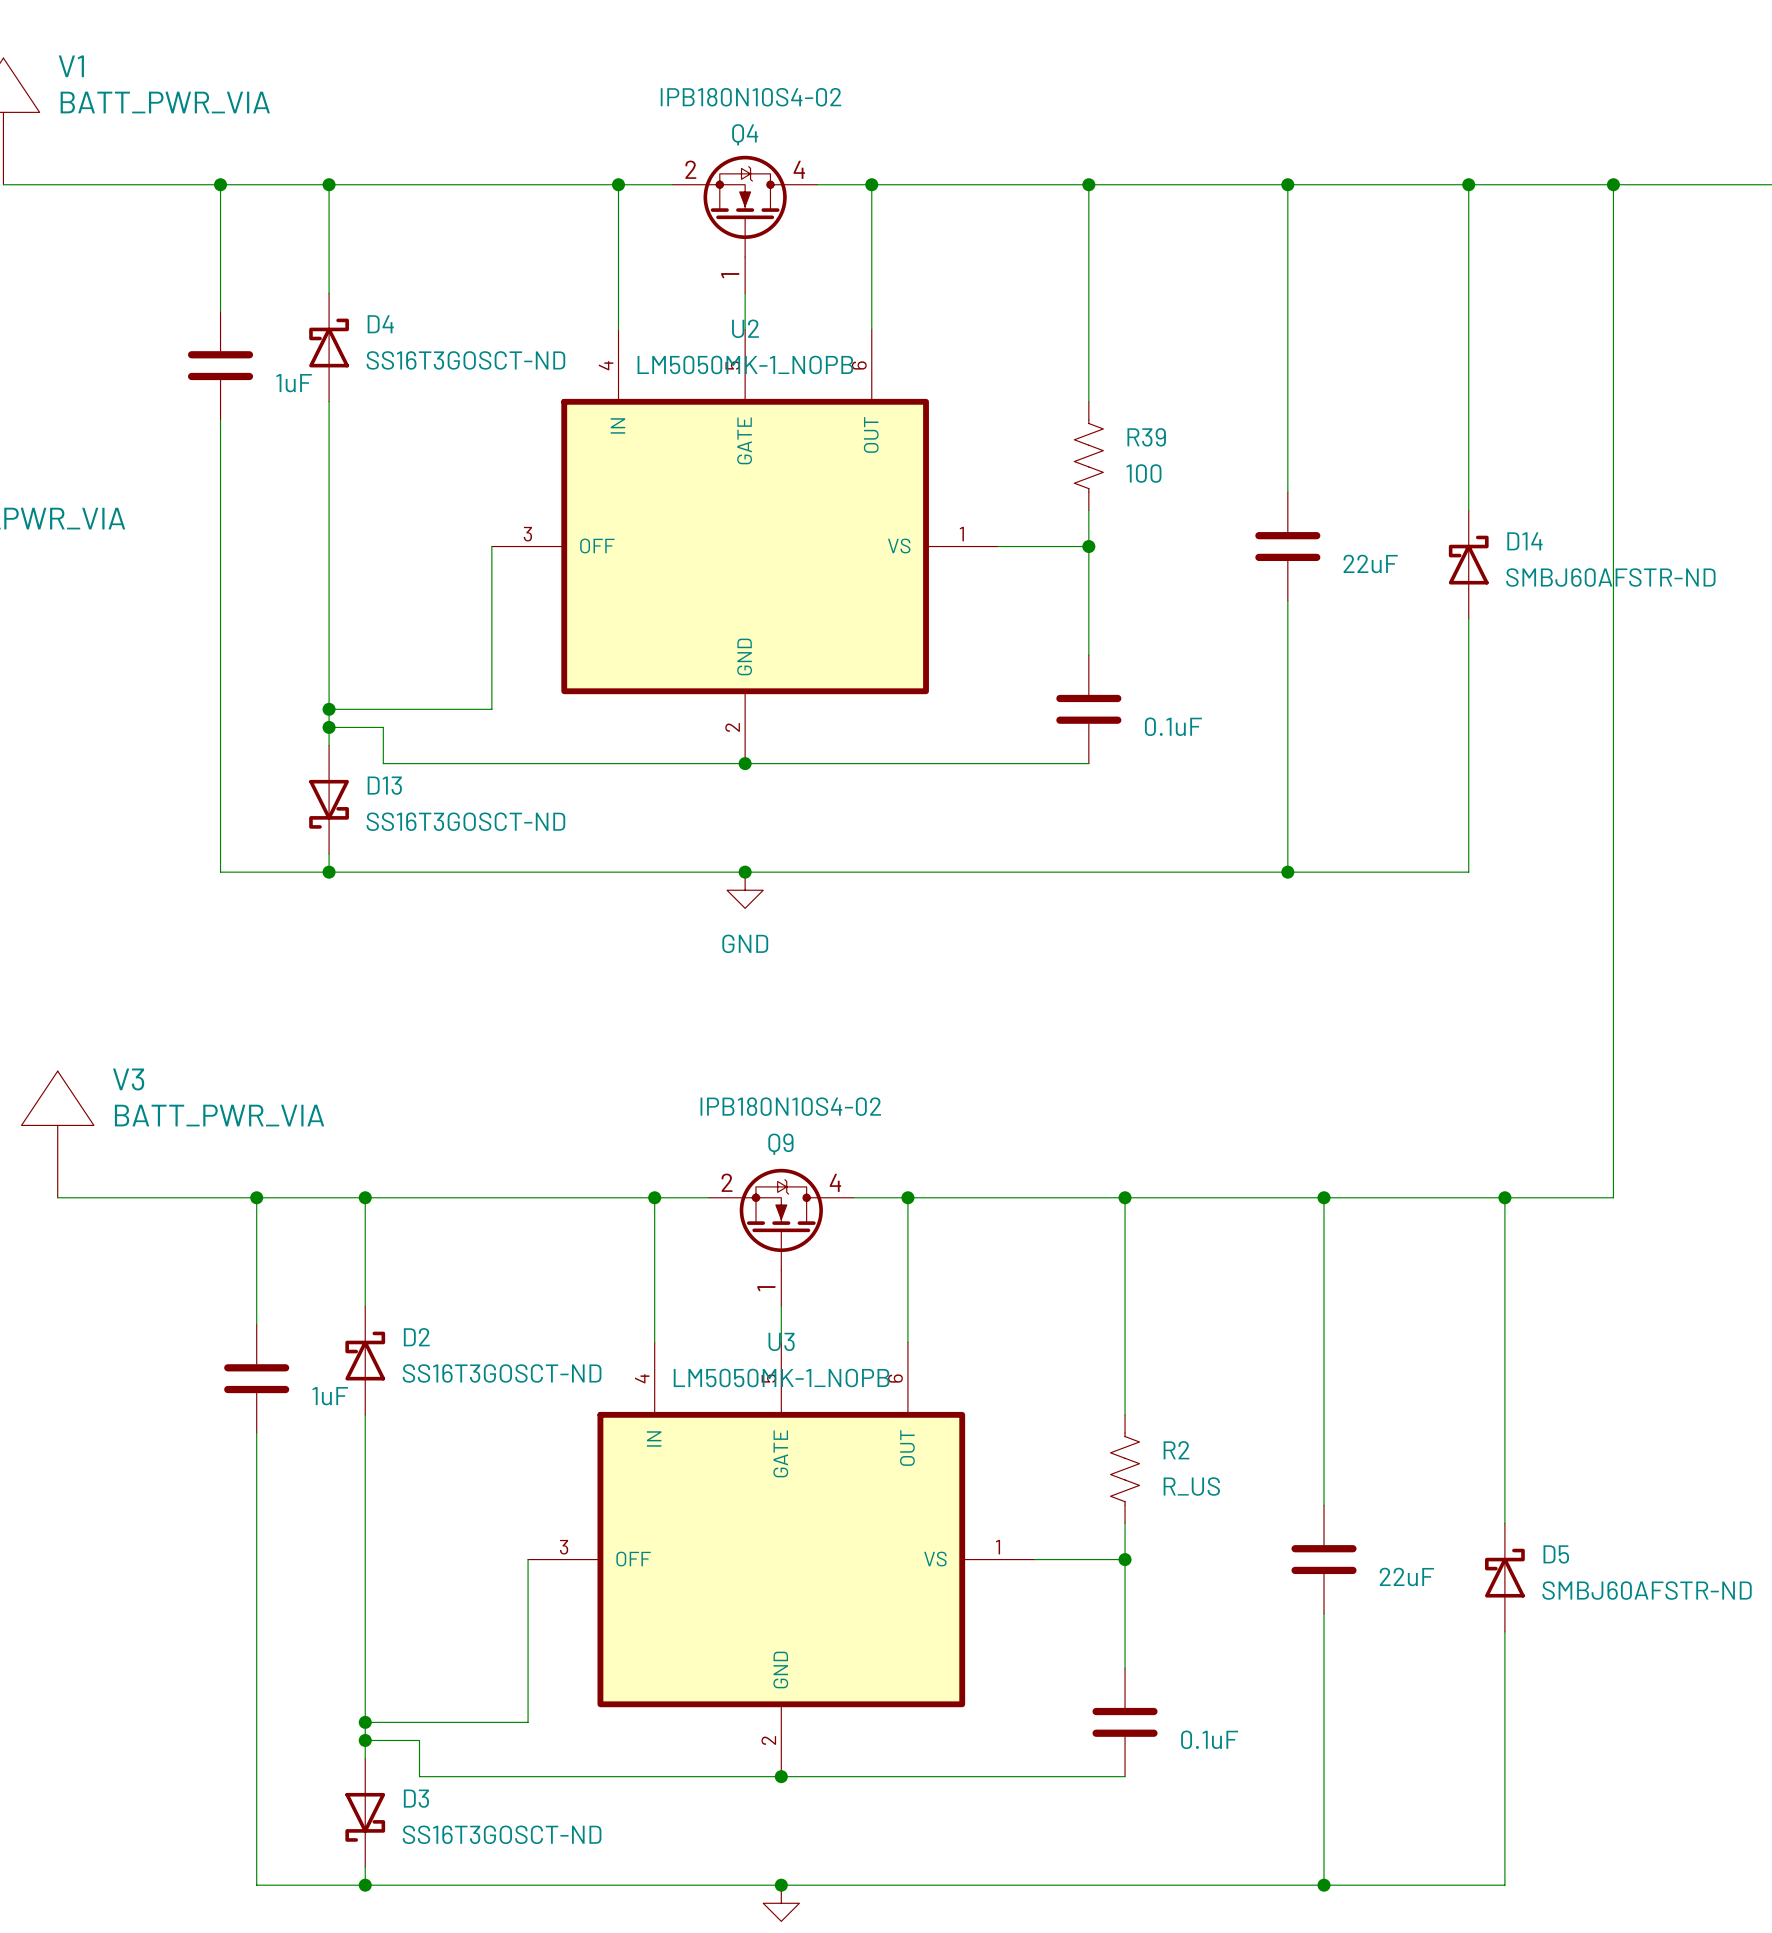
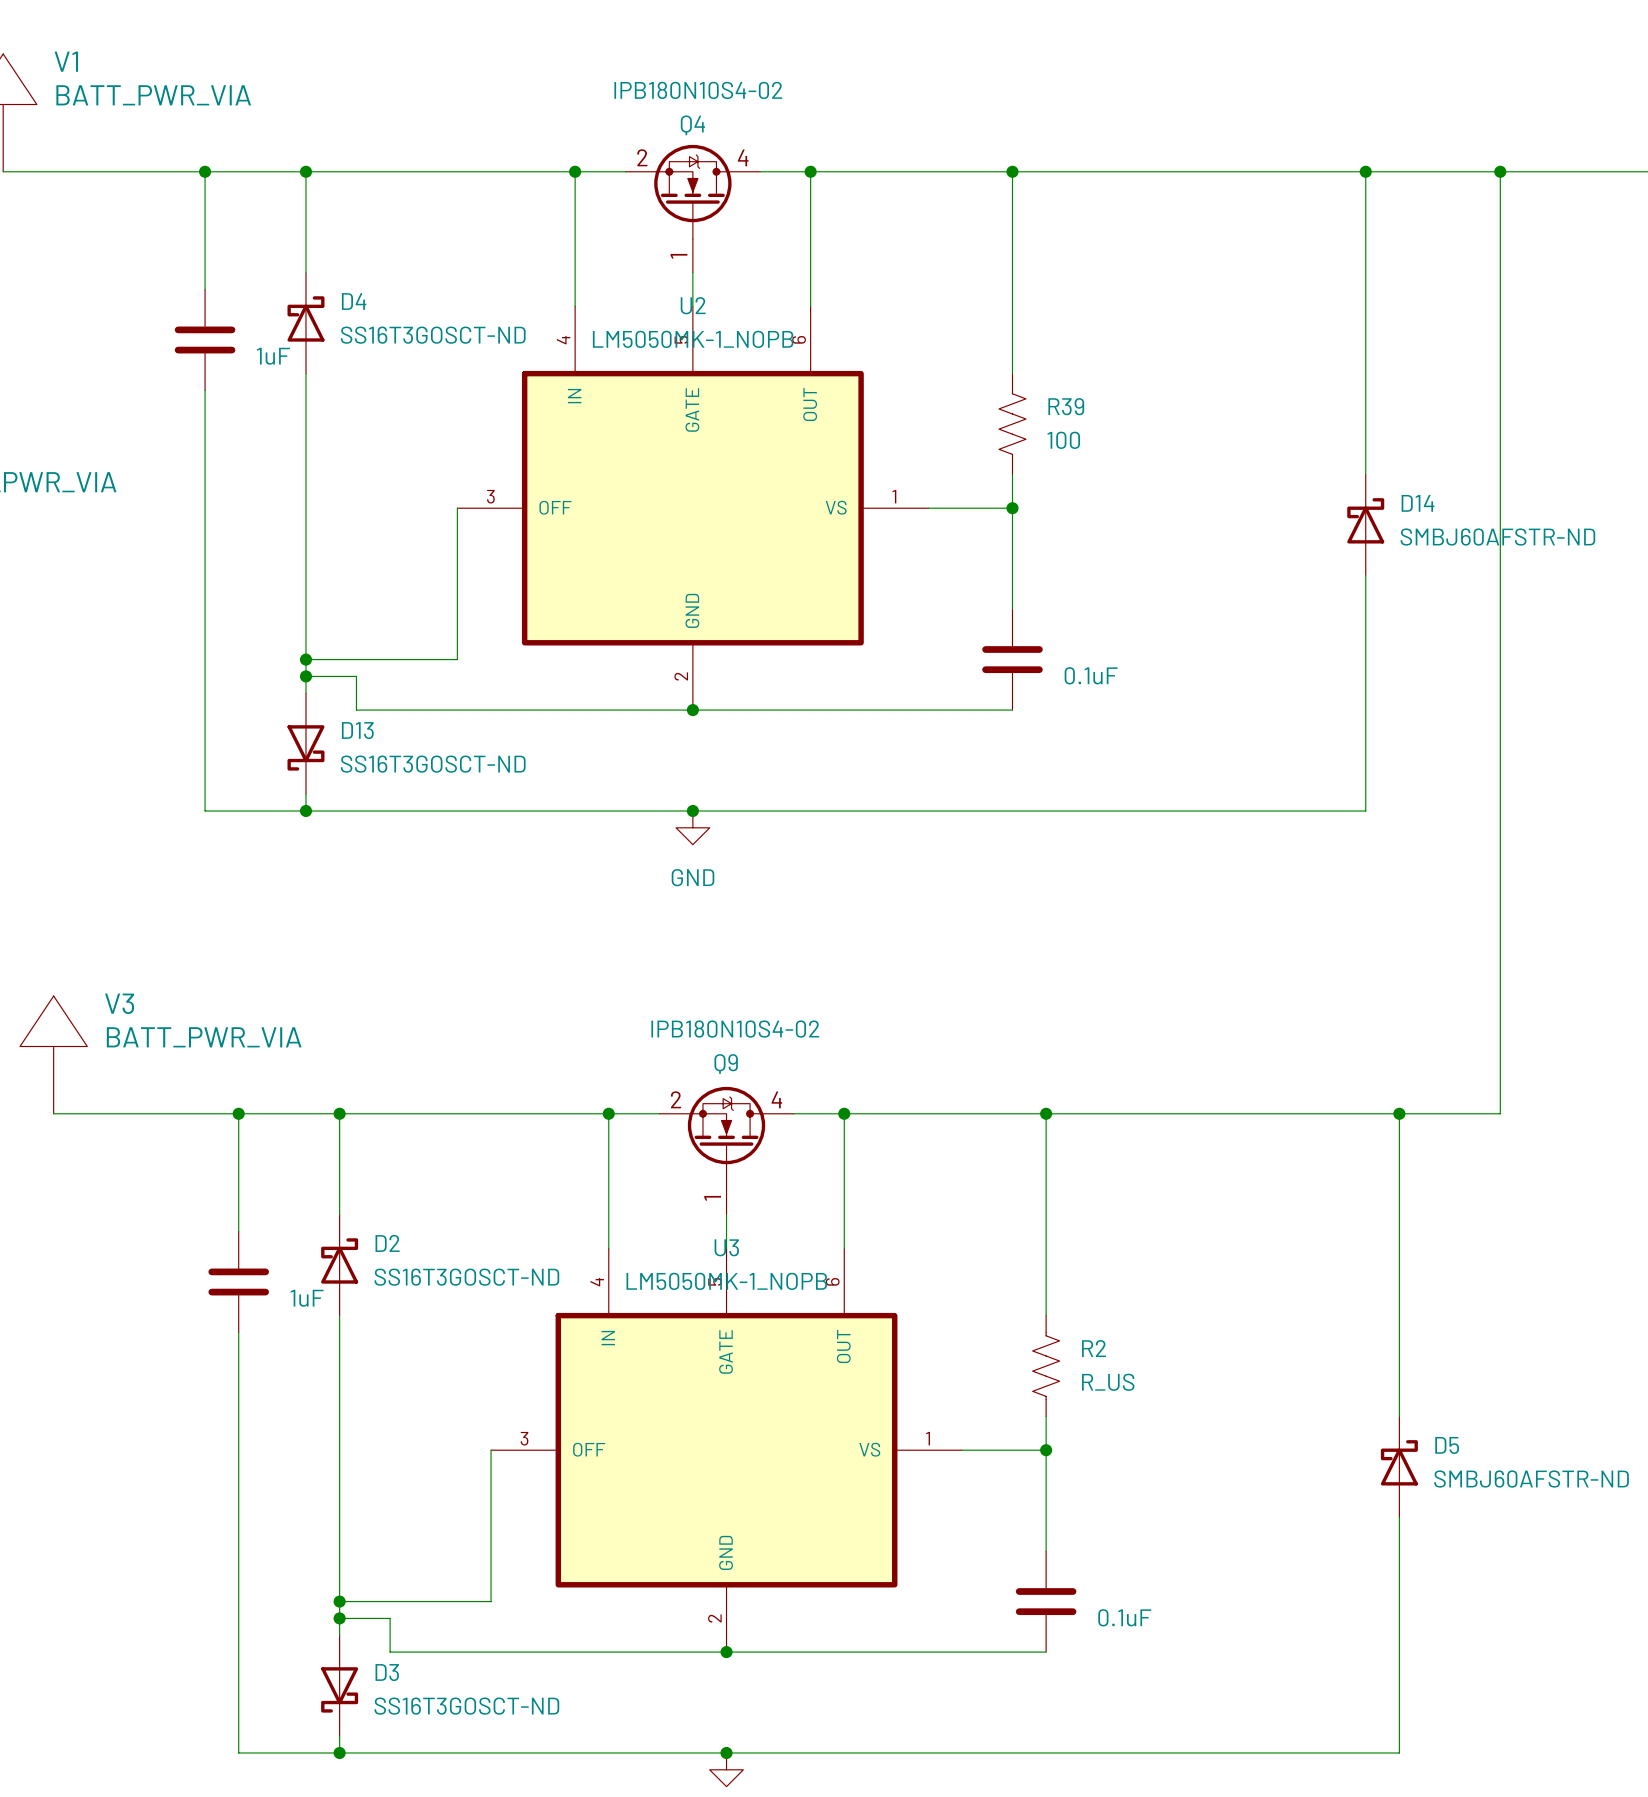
wire: (1287, 184) (1287, 492) -> none
junction: (1287, 184) -> none
part: 22uF (1287, 546) -> none
wire: (1287, 600) (1287, 872) -> none
junction: (1287, 872) -> none
wire: (1324, 1197) (1324, 1505) -> none
junction: (1324, 1197) -> none
part: 22uF (1324, 1559) -> none
wire: (1324, 1613) (1324, 1885) -> none
junction: (1324, 1885) -> none

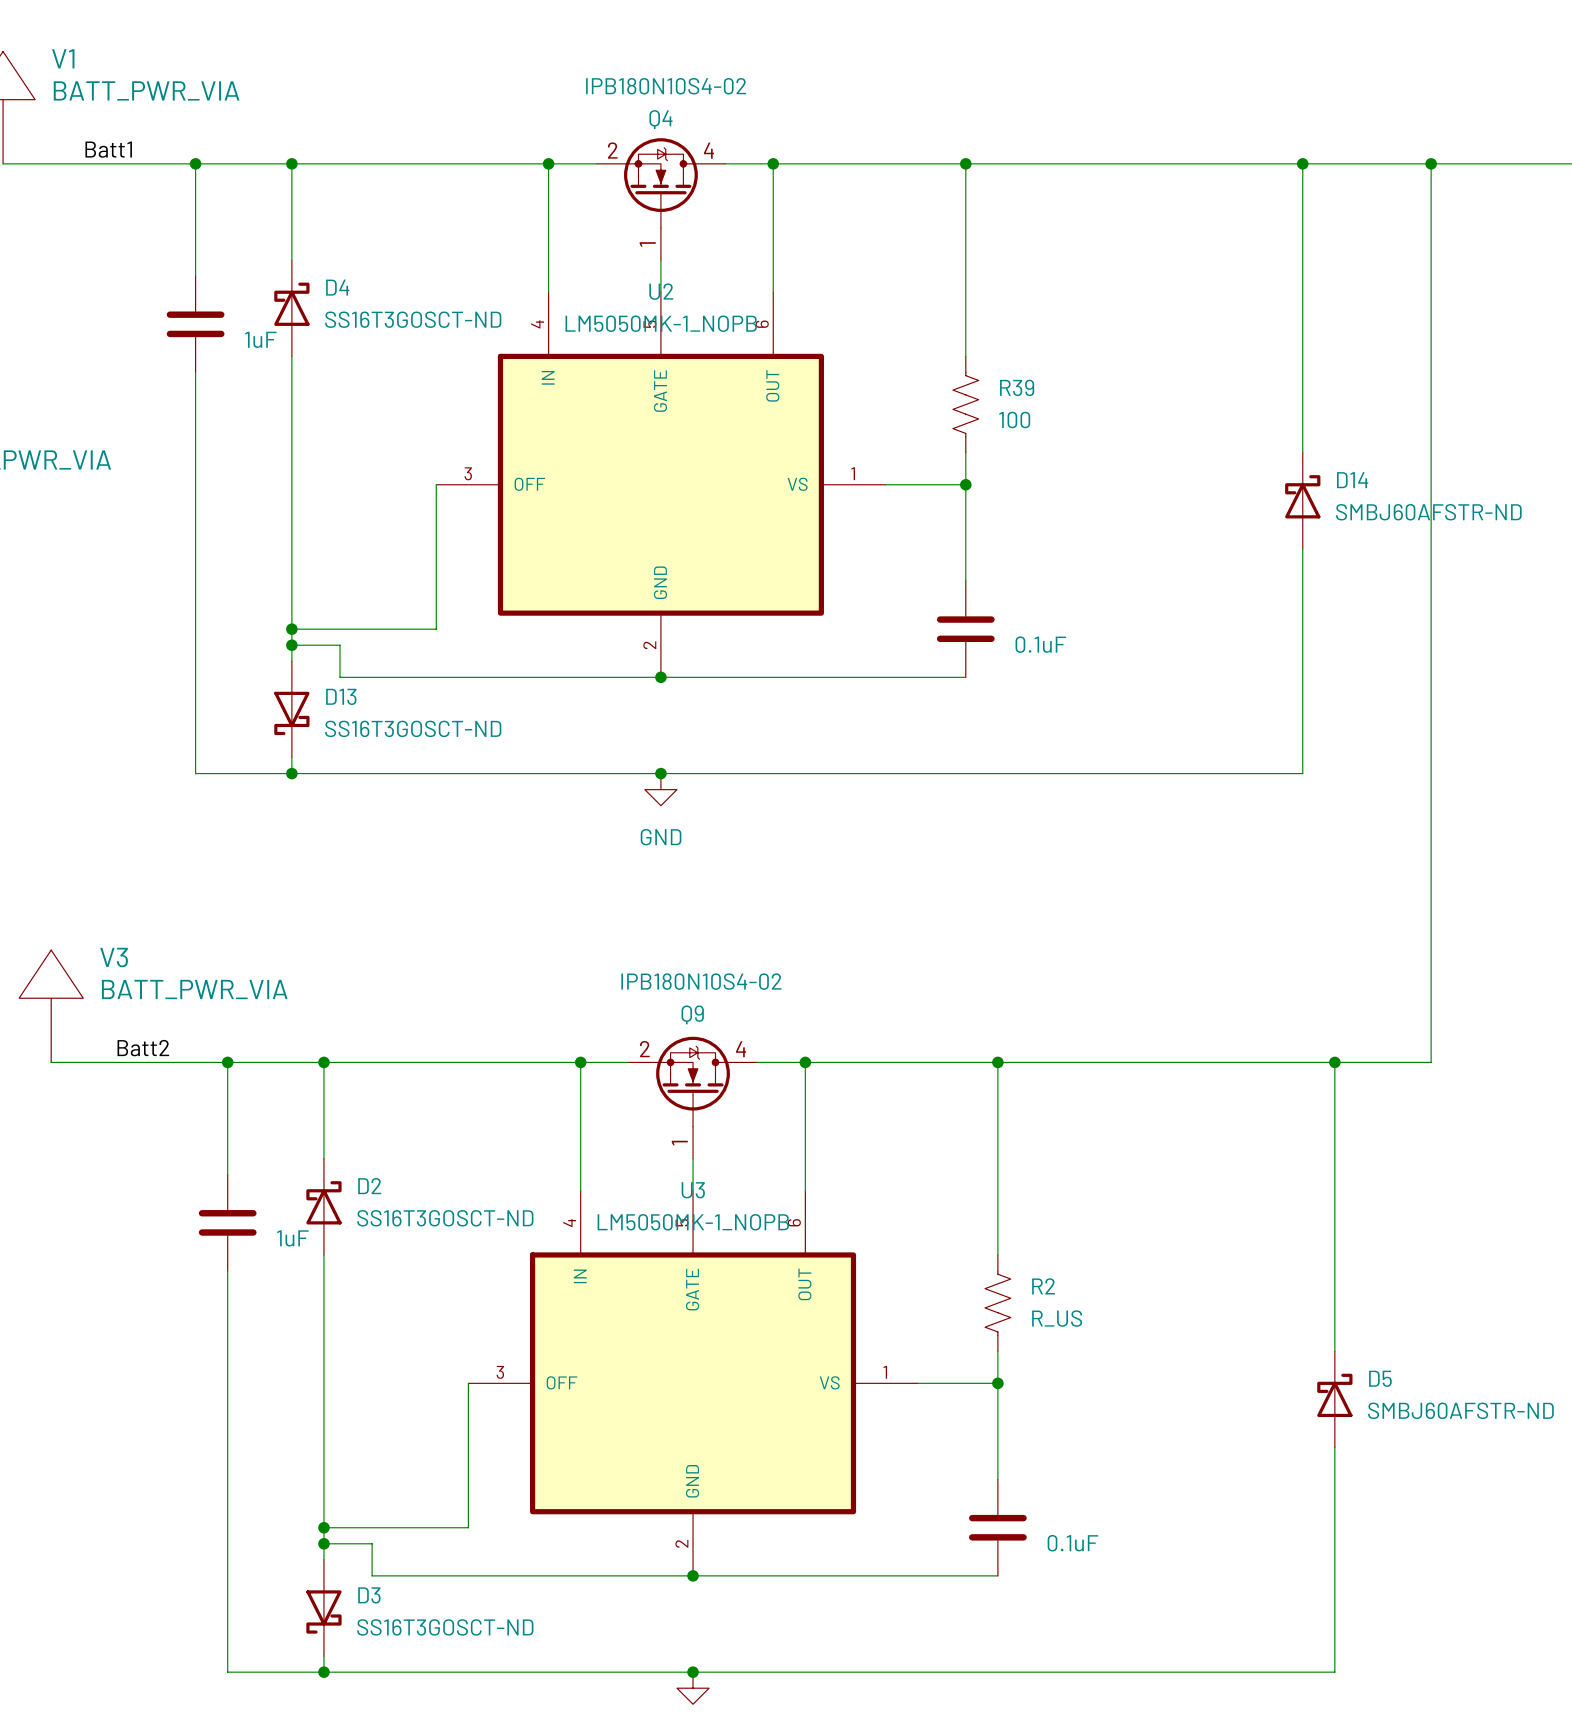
label: none -> Batt1 (108, 149)
label: none -> Batt2 (143, 1048)

